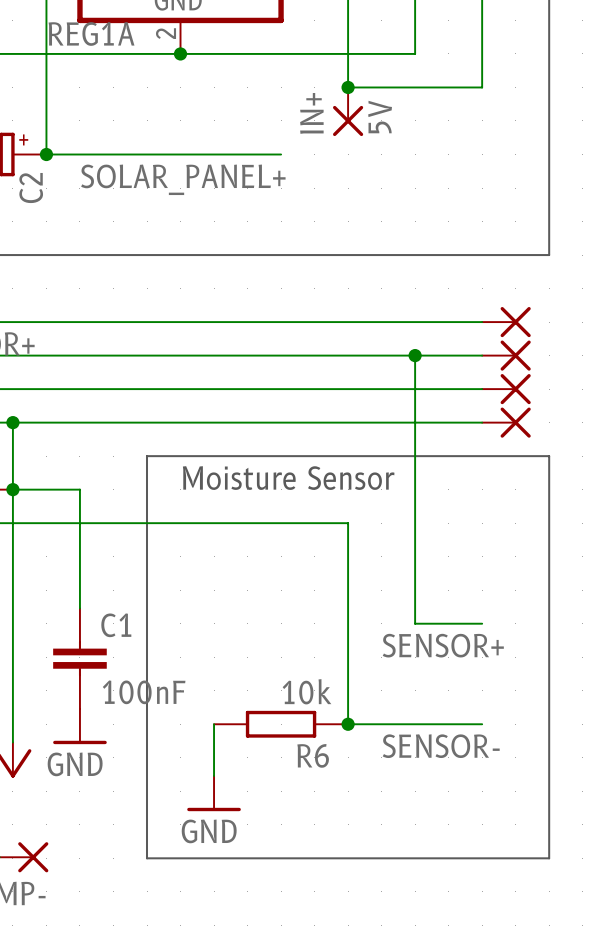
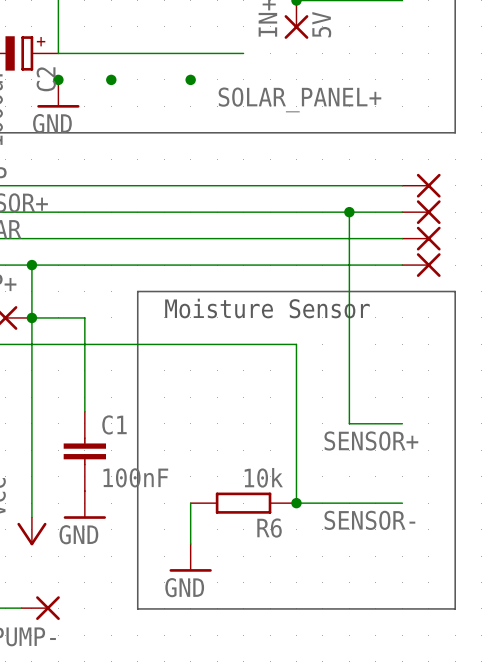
junction position: (46, 154) -> (58, 79)
label position: SOLAR_PANEL+ (183, 179) -> SOLAR_PANEL+ (299, 99)
junction: none -> (111, 79)
junction: none -> (190, 79)
power symbol: none -> GND (58, 93)

